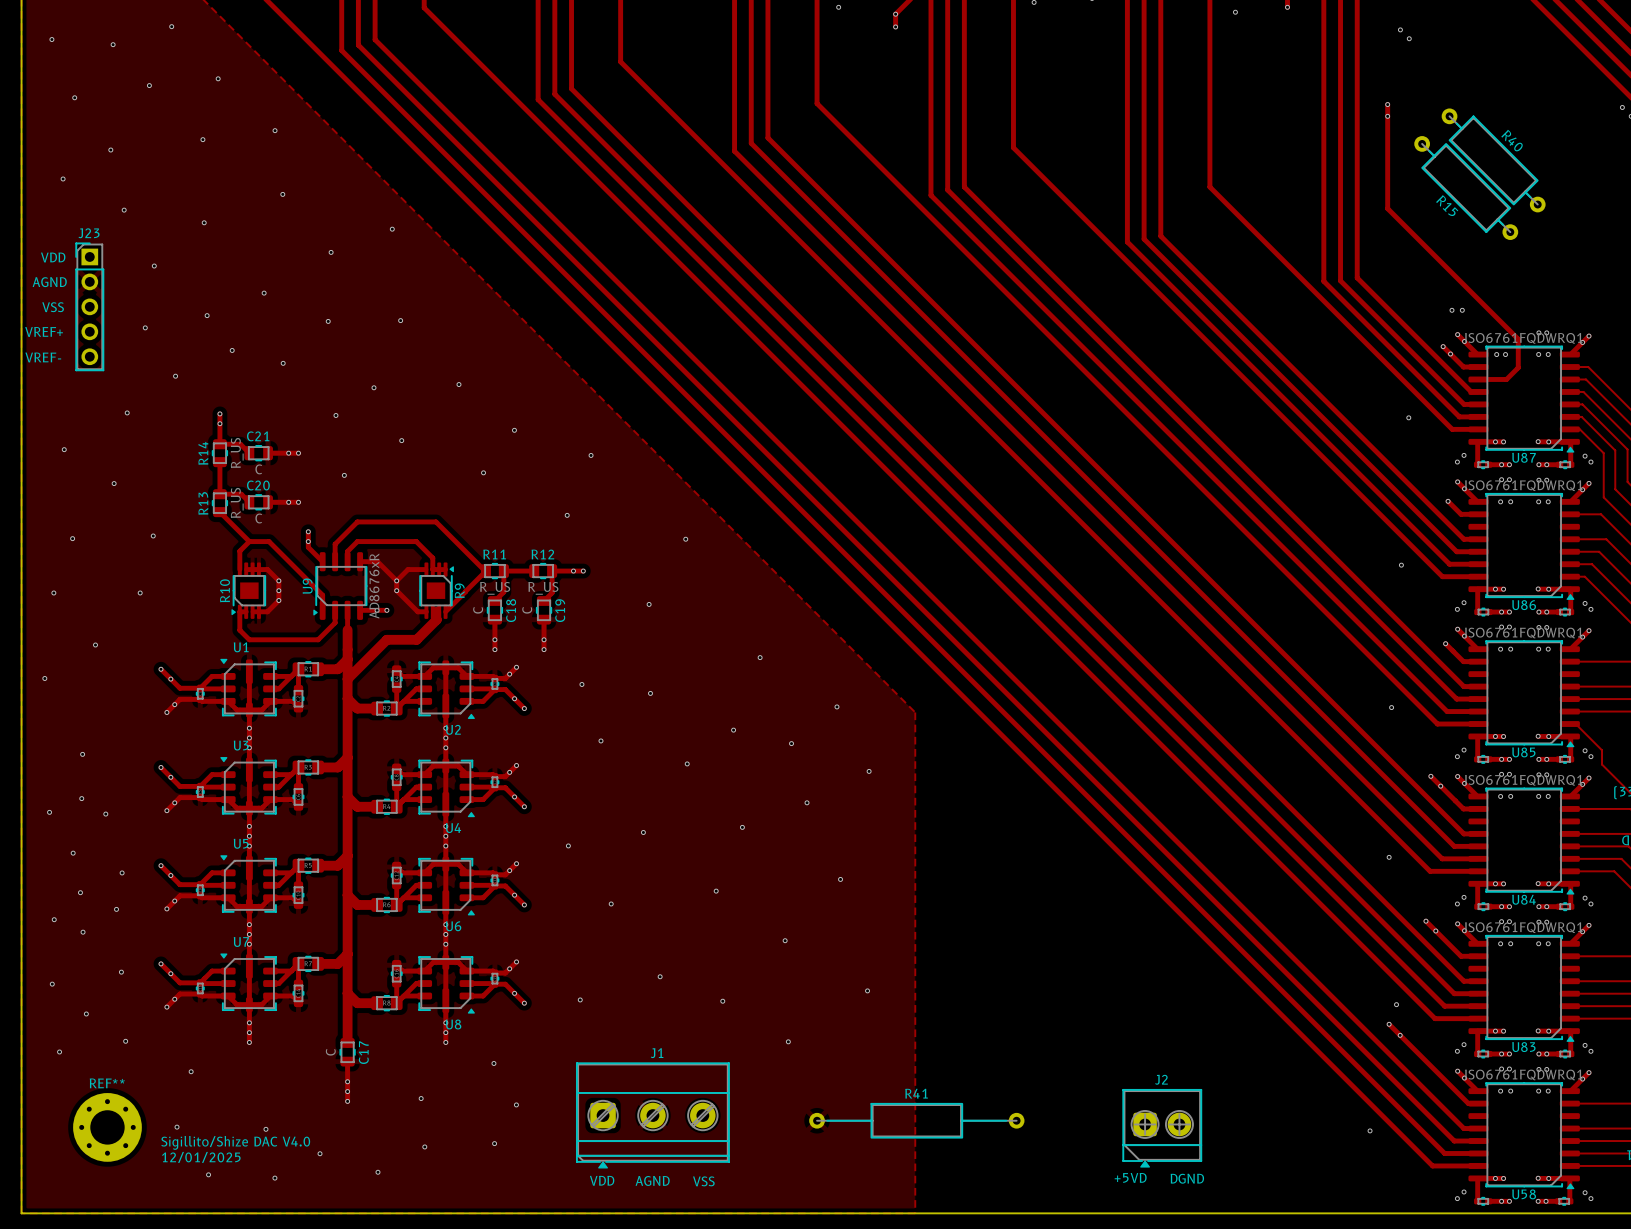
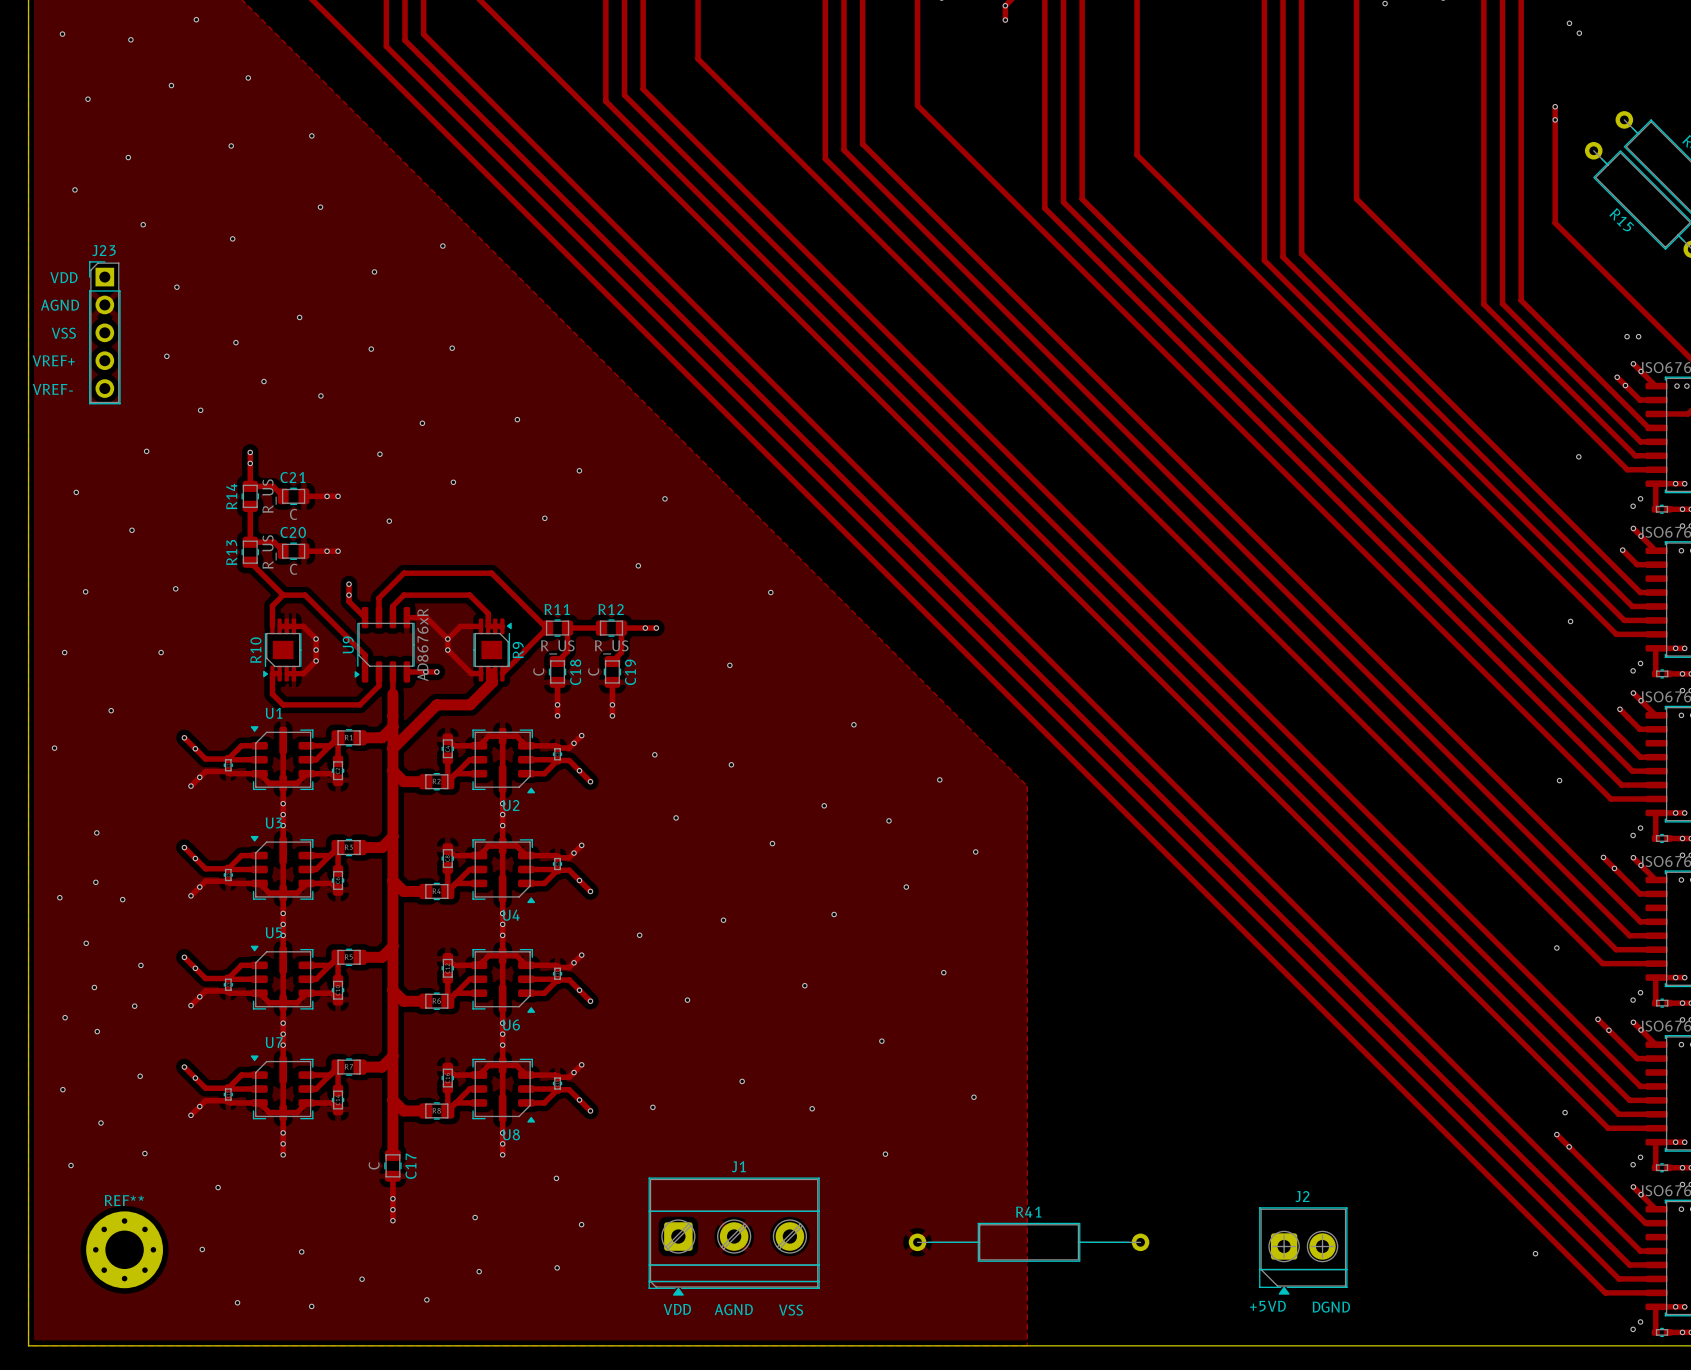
text: Sigillito/Shize DAC V4.0 (235, 1142) -> none
text: 12/01/2025 (201, 1157) -> none

